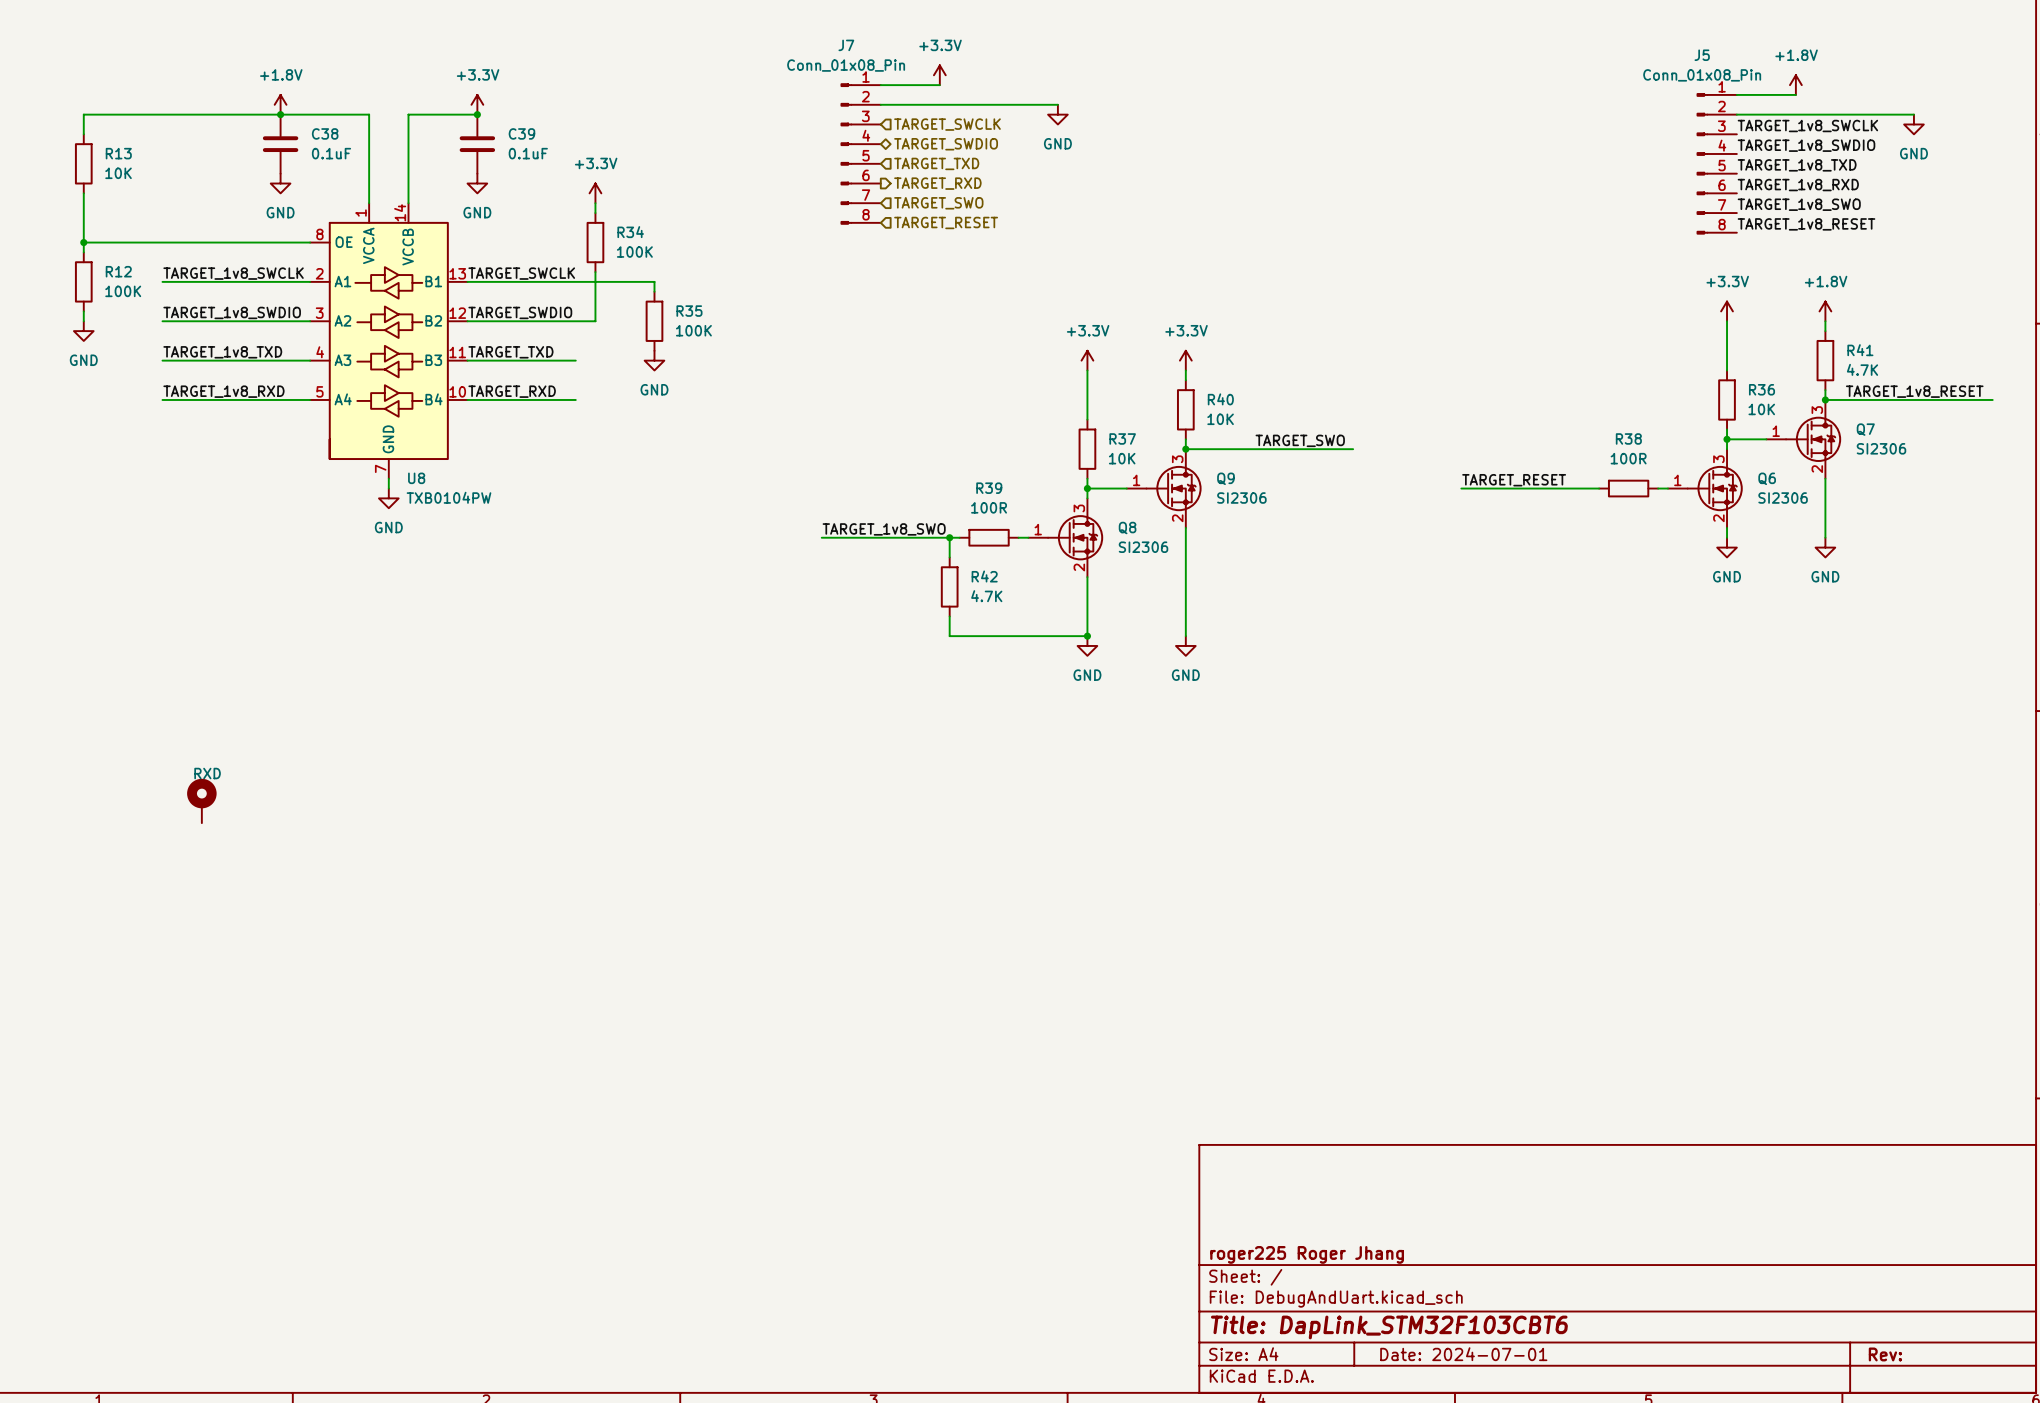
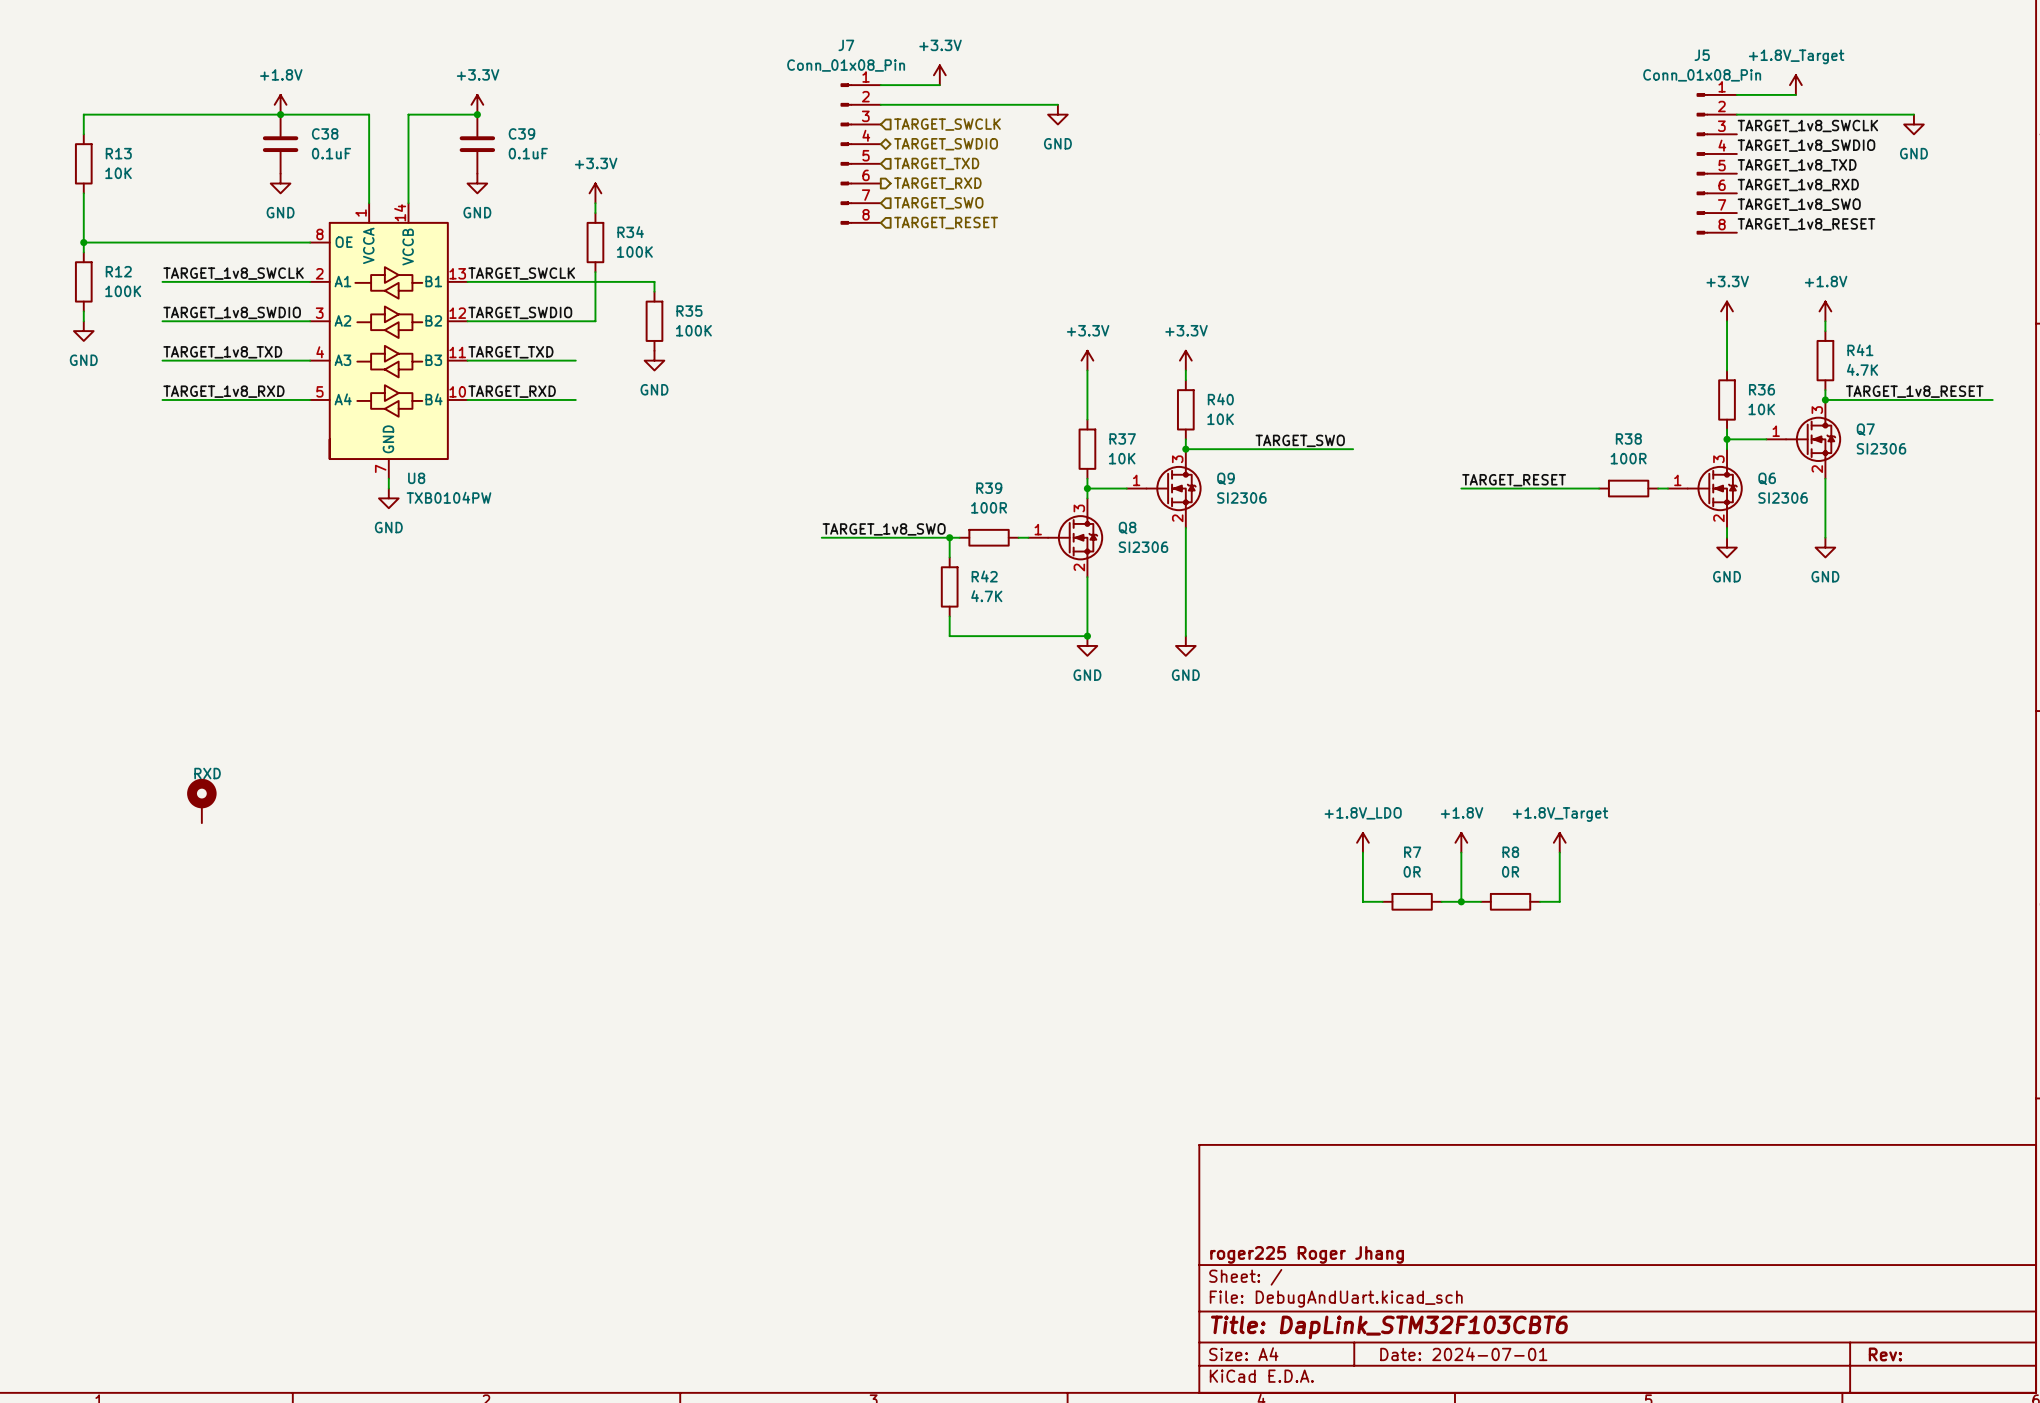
power symbol: +1.8V (1795, 85) -> +1.8V_Target (1795, 85)
power symbol: none -> +1.8V_LDO (1362, 842)
power symbol: none -> +1.8V (1461, 842)
power symbol: none -> +1.8V_Target (1559, 842)
wire: none -> (1362, 852) (1362, 901) (1382, 901)
wire: none -> (1461, 852) (1461, 901)
wire: none -> (1559, 852) (1559, 901) (1540, 901)
R7: none -> 0R (1412, 901)
wire: none -> (1441, 901) (1481, 901)
junction: none -> (1461, 901)
R8: none -> 0R (1510, 901)

